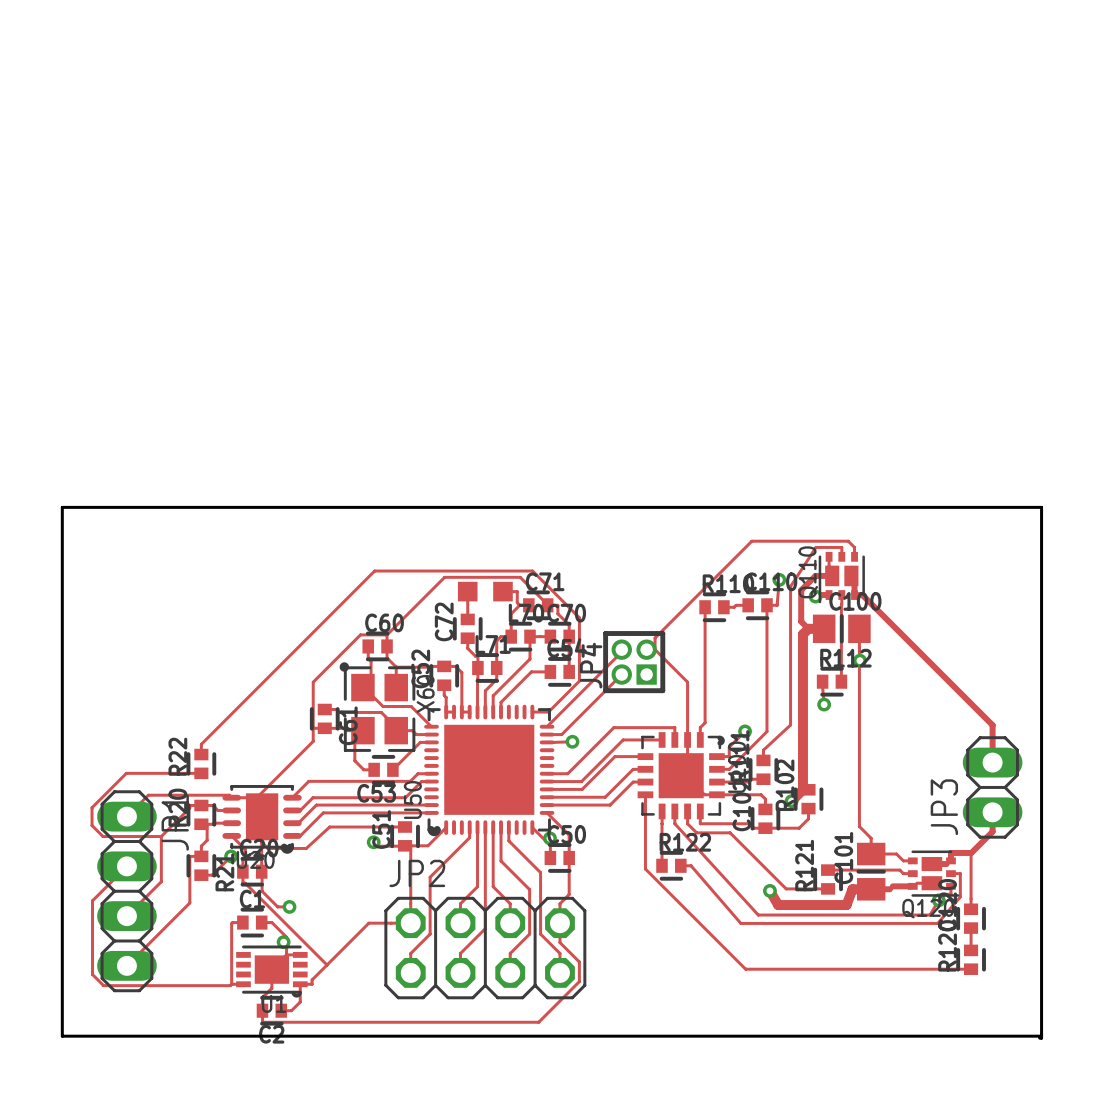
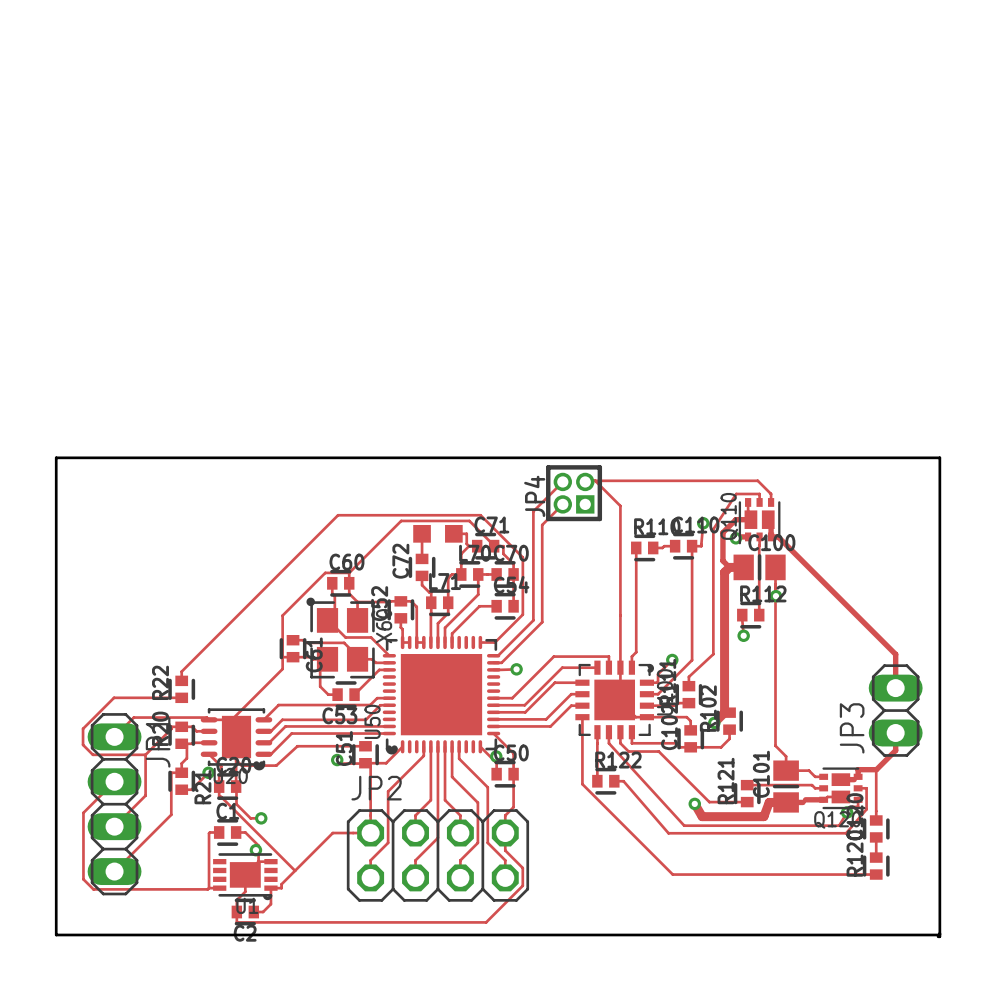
track: (848, 541) (751, 541) (655, 637) (655, 649) -> (765, 488) (757, 480) (585, 481)
track: (621, 649) (621, 652) (547, 726) -> (562, 481) (533, 511) (533, 620) (498, 655) (493, 655)
track: (655, 649) (687, 682) -> (595, 480) (620, 505) (620, 615)
JP4 position: (634, 662) -> (574, 493)
track: (621, 674) (561, 734) (555, 734) -> (562, 504) (542, 524) (542, 622) (501, 662)

